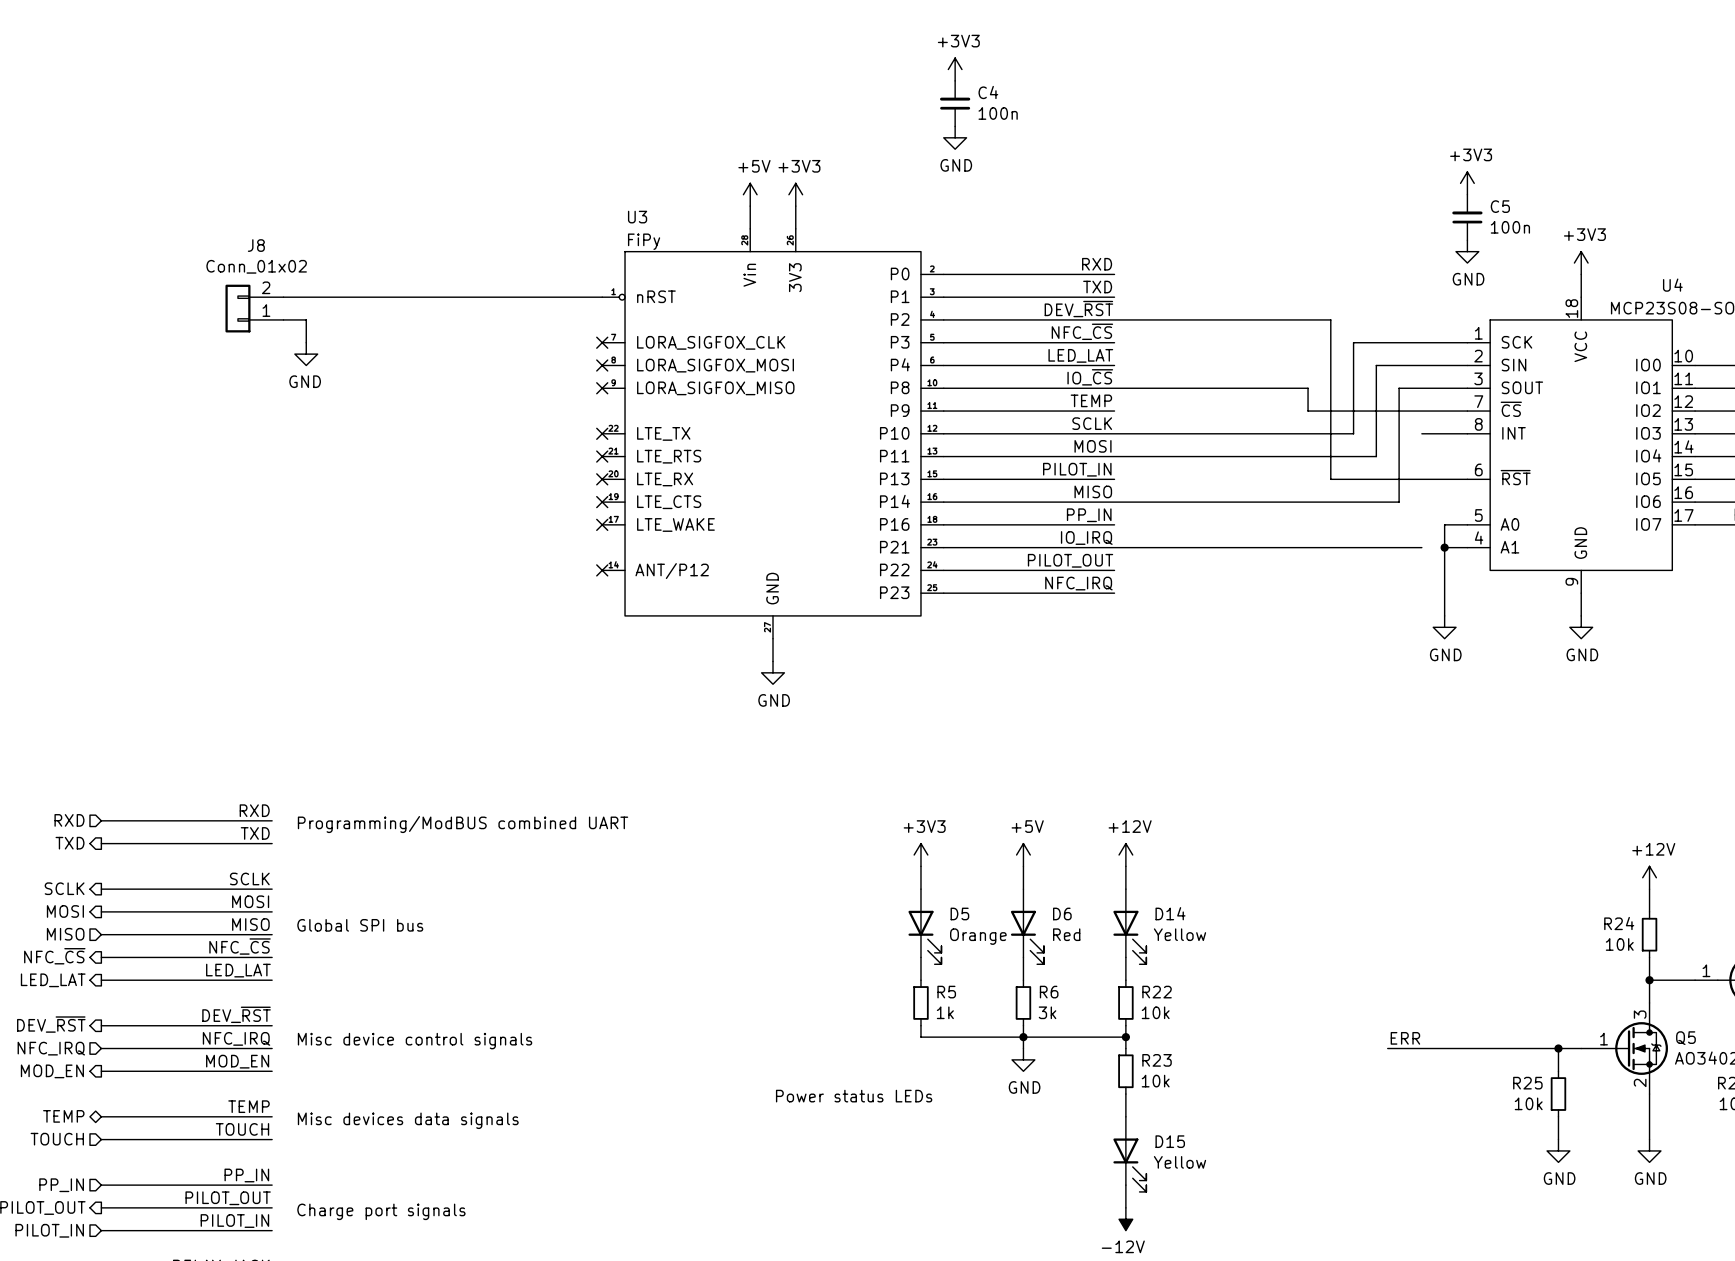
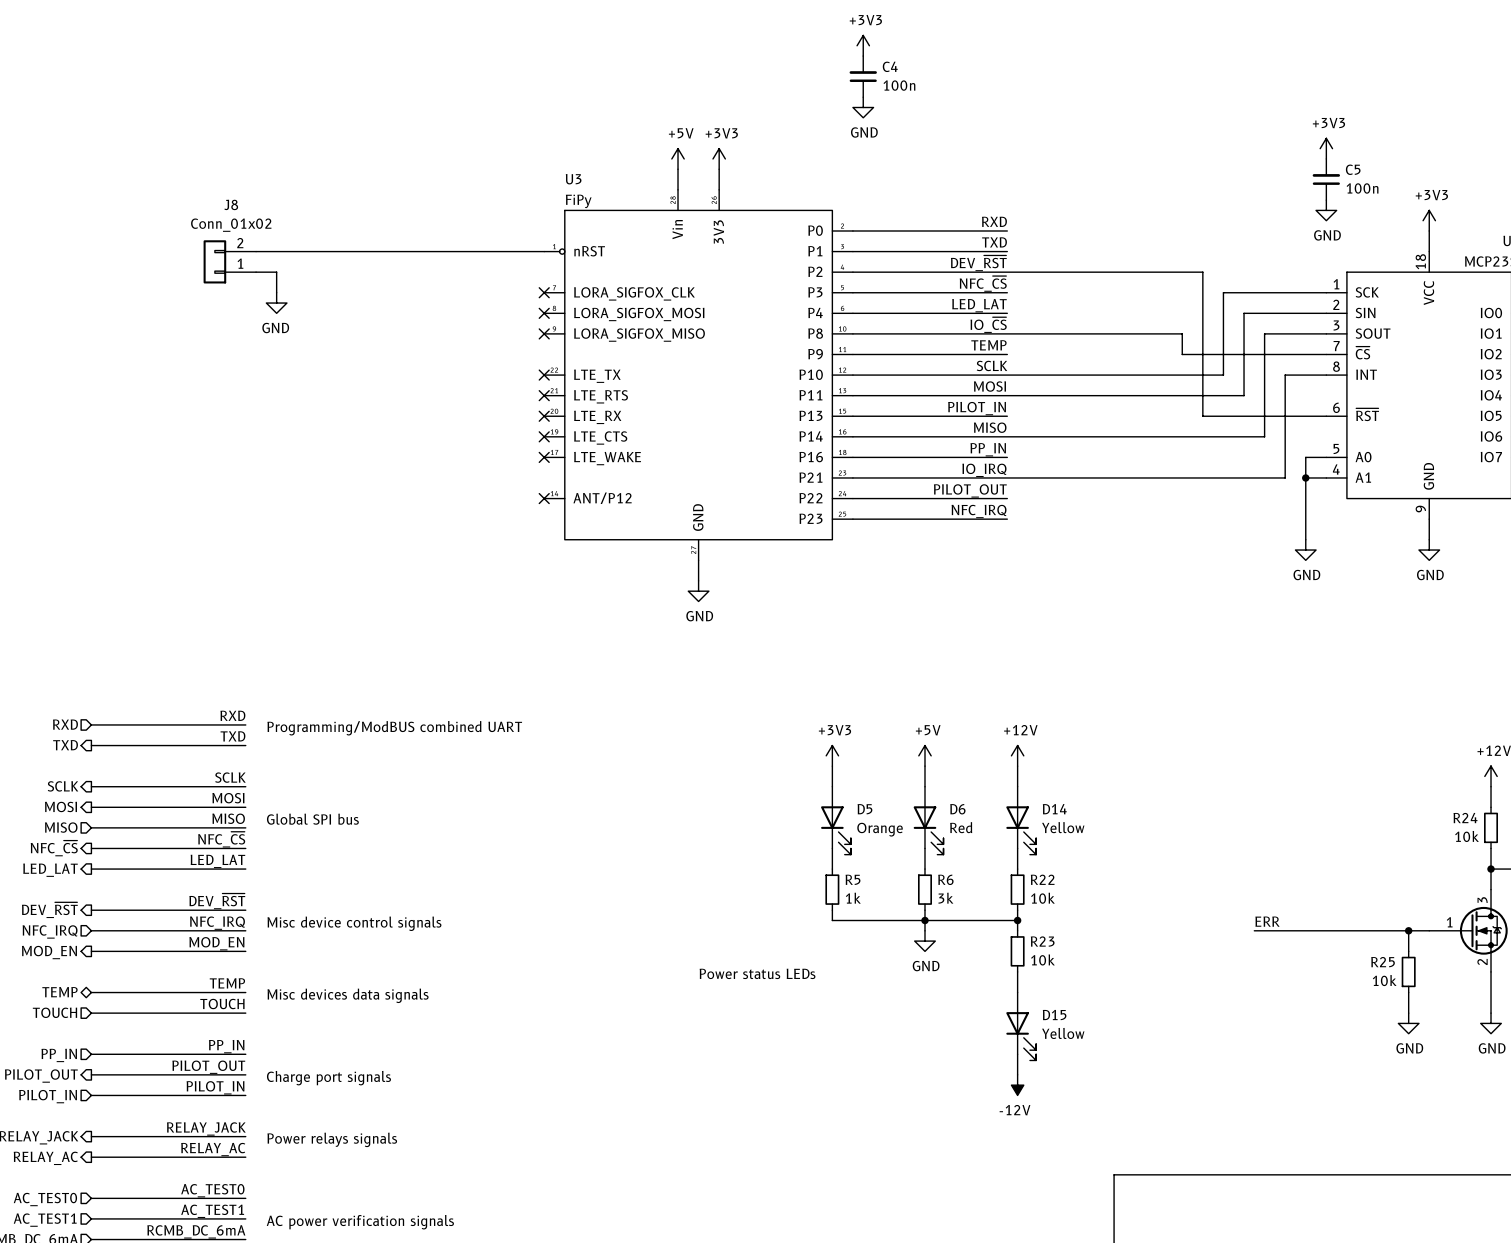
wire: none -> (1285, 375) (1285, 477)

